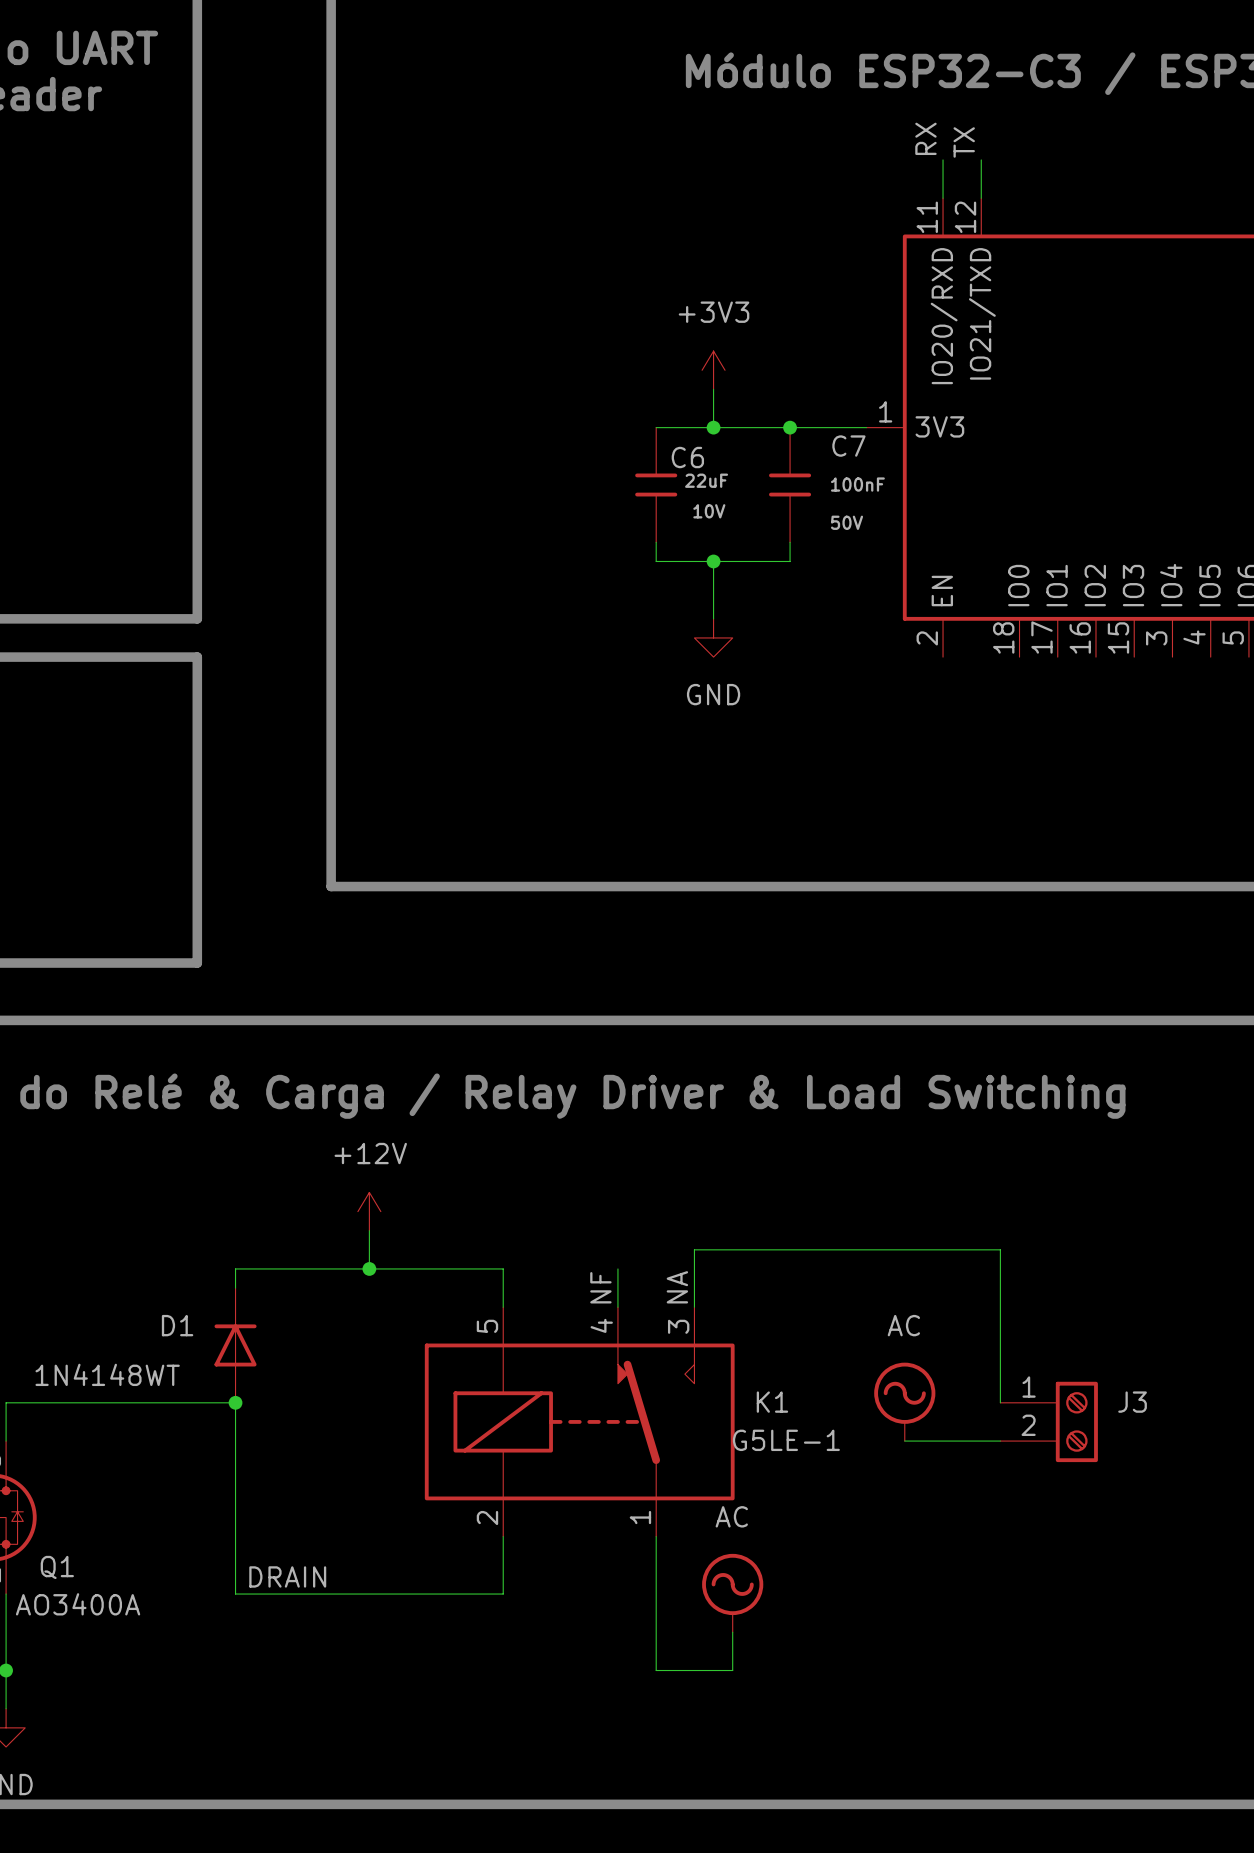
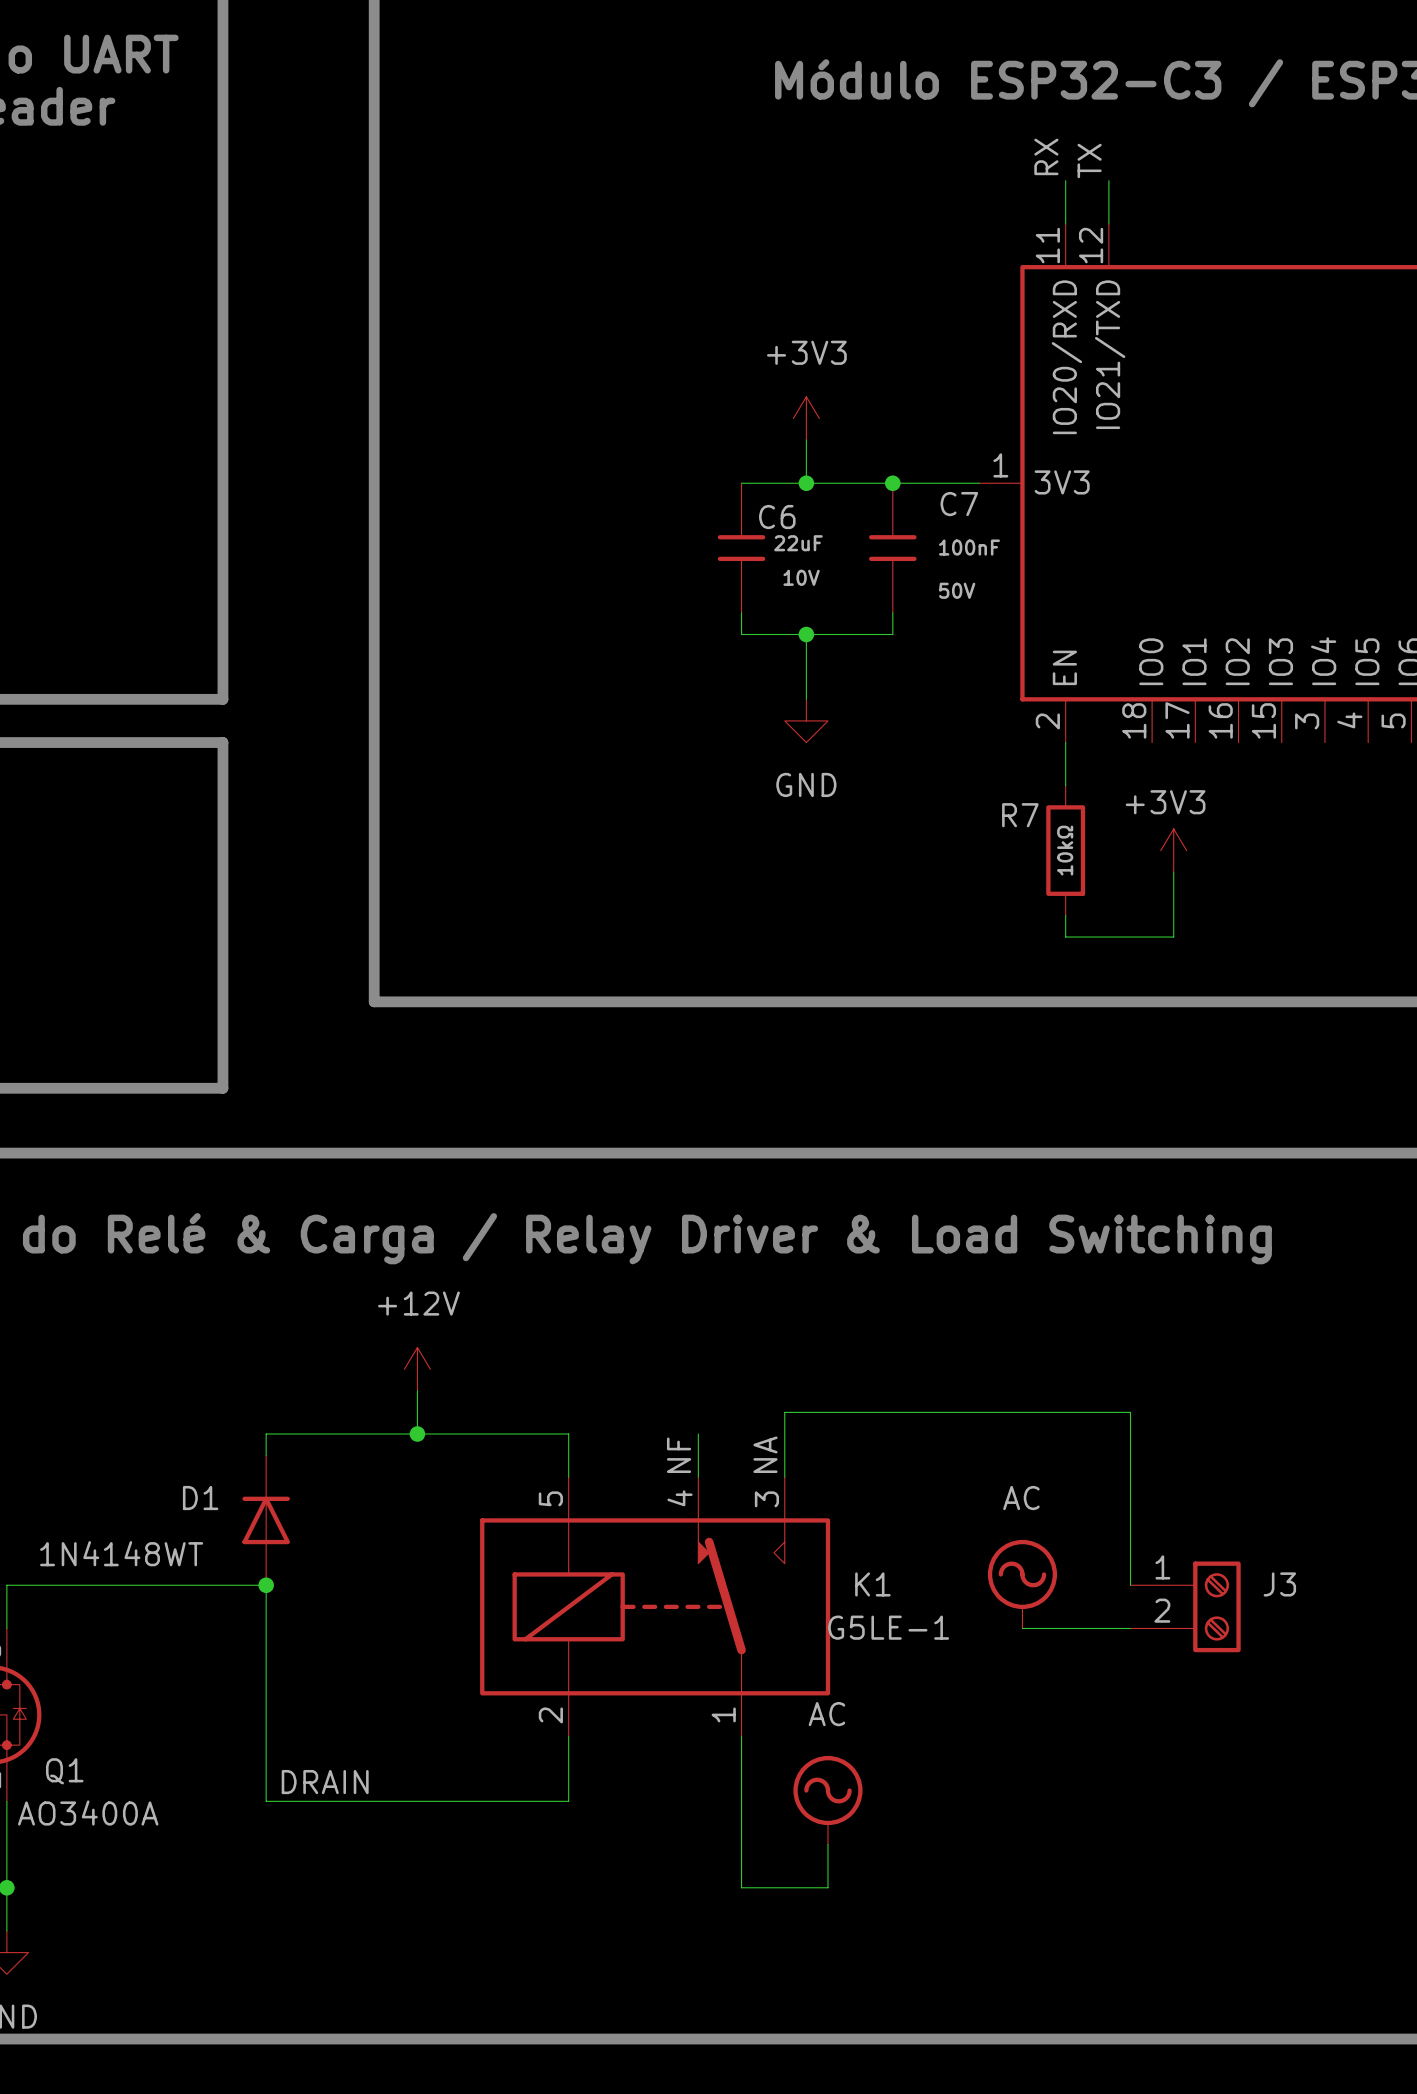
wire: none -> (1065, 742) (1065, 785)
R7: none -> 10kΩ (1065, 850)
power symbol: none -> +3V3 (1173, 850)
wire: none -> (1173, 872) (1173, 937) (1065, 937) (1065, 915)

